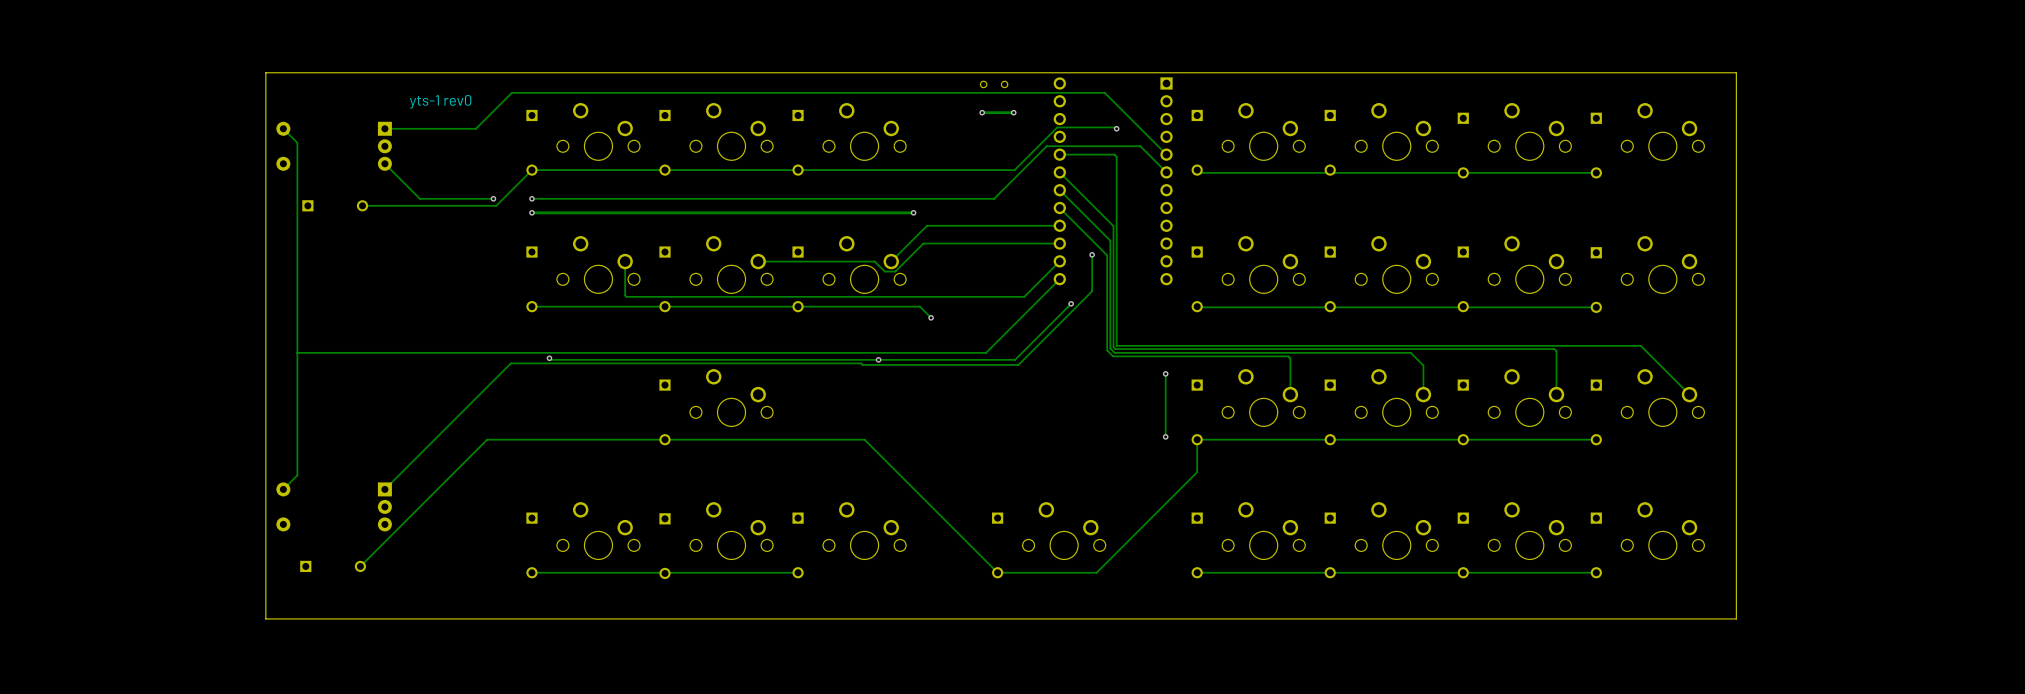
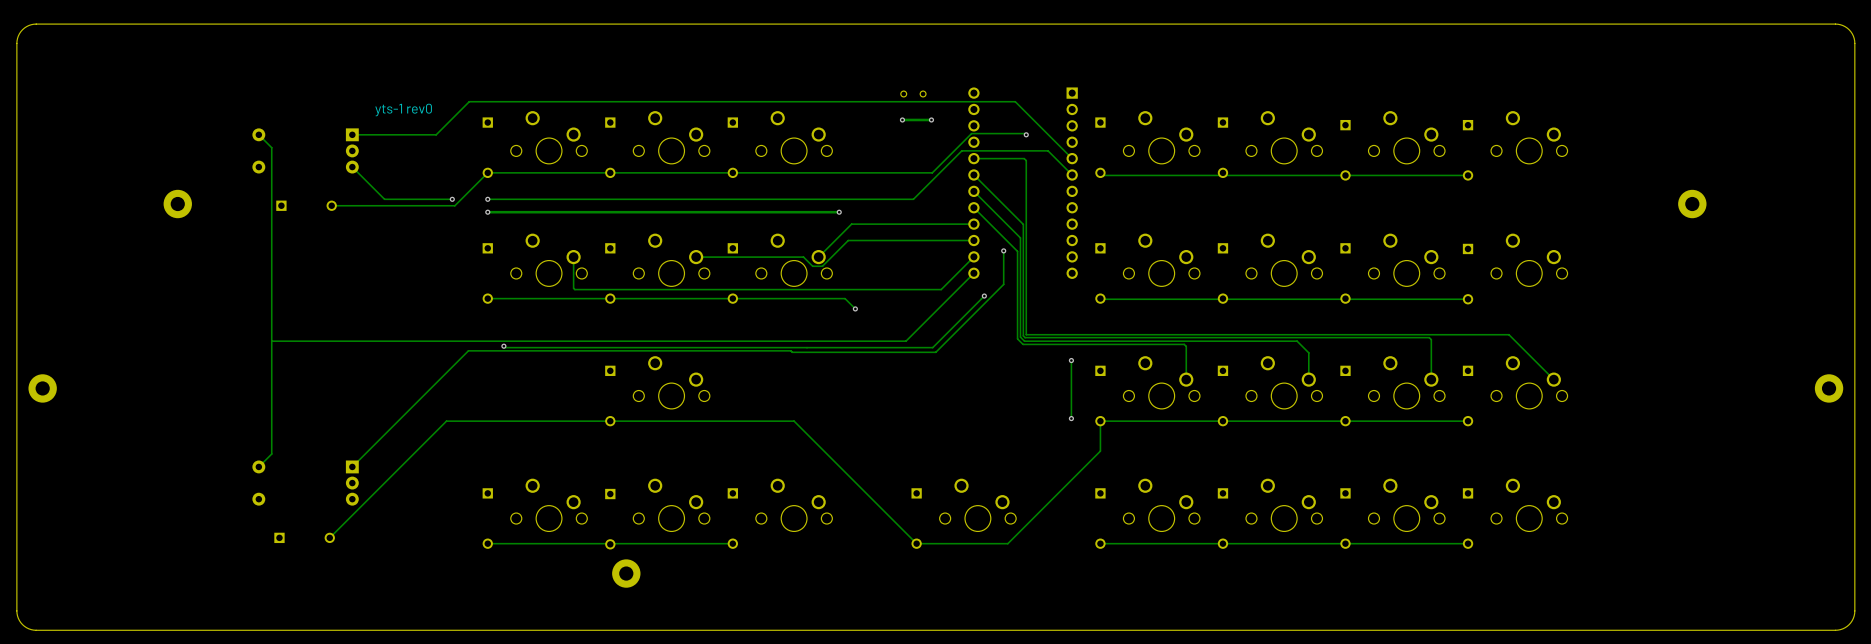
board edge: (1736, 72) (265, 72) (265, 618) (1736, 618) (1736, 72) -> (1835, 24) (1849, 29) (1854, 43) (1854, 610) (1850, 622) (1840, 629) (36, 630) (24, 626) (17, 615) (16, 43) (20, 31) (31, 24) (1835, 24)
part: none -> (177, 204)
part: none -> (1692, 204)
via: (878, 359) -> none
part: none -> (42, 388)
part: none -> (1829, 388)
part: none -> (626, 573)

